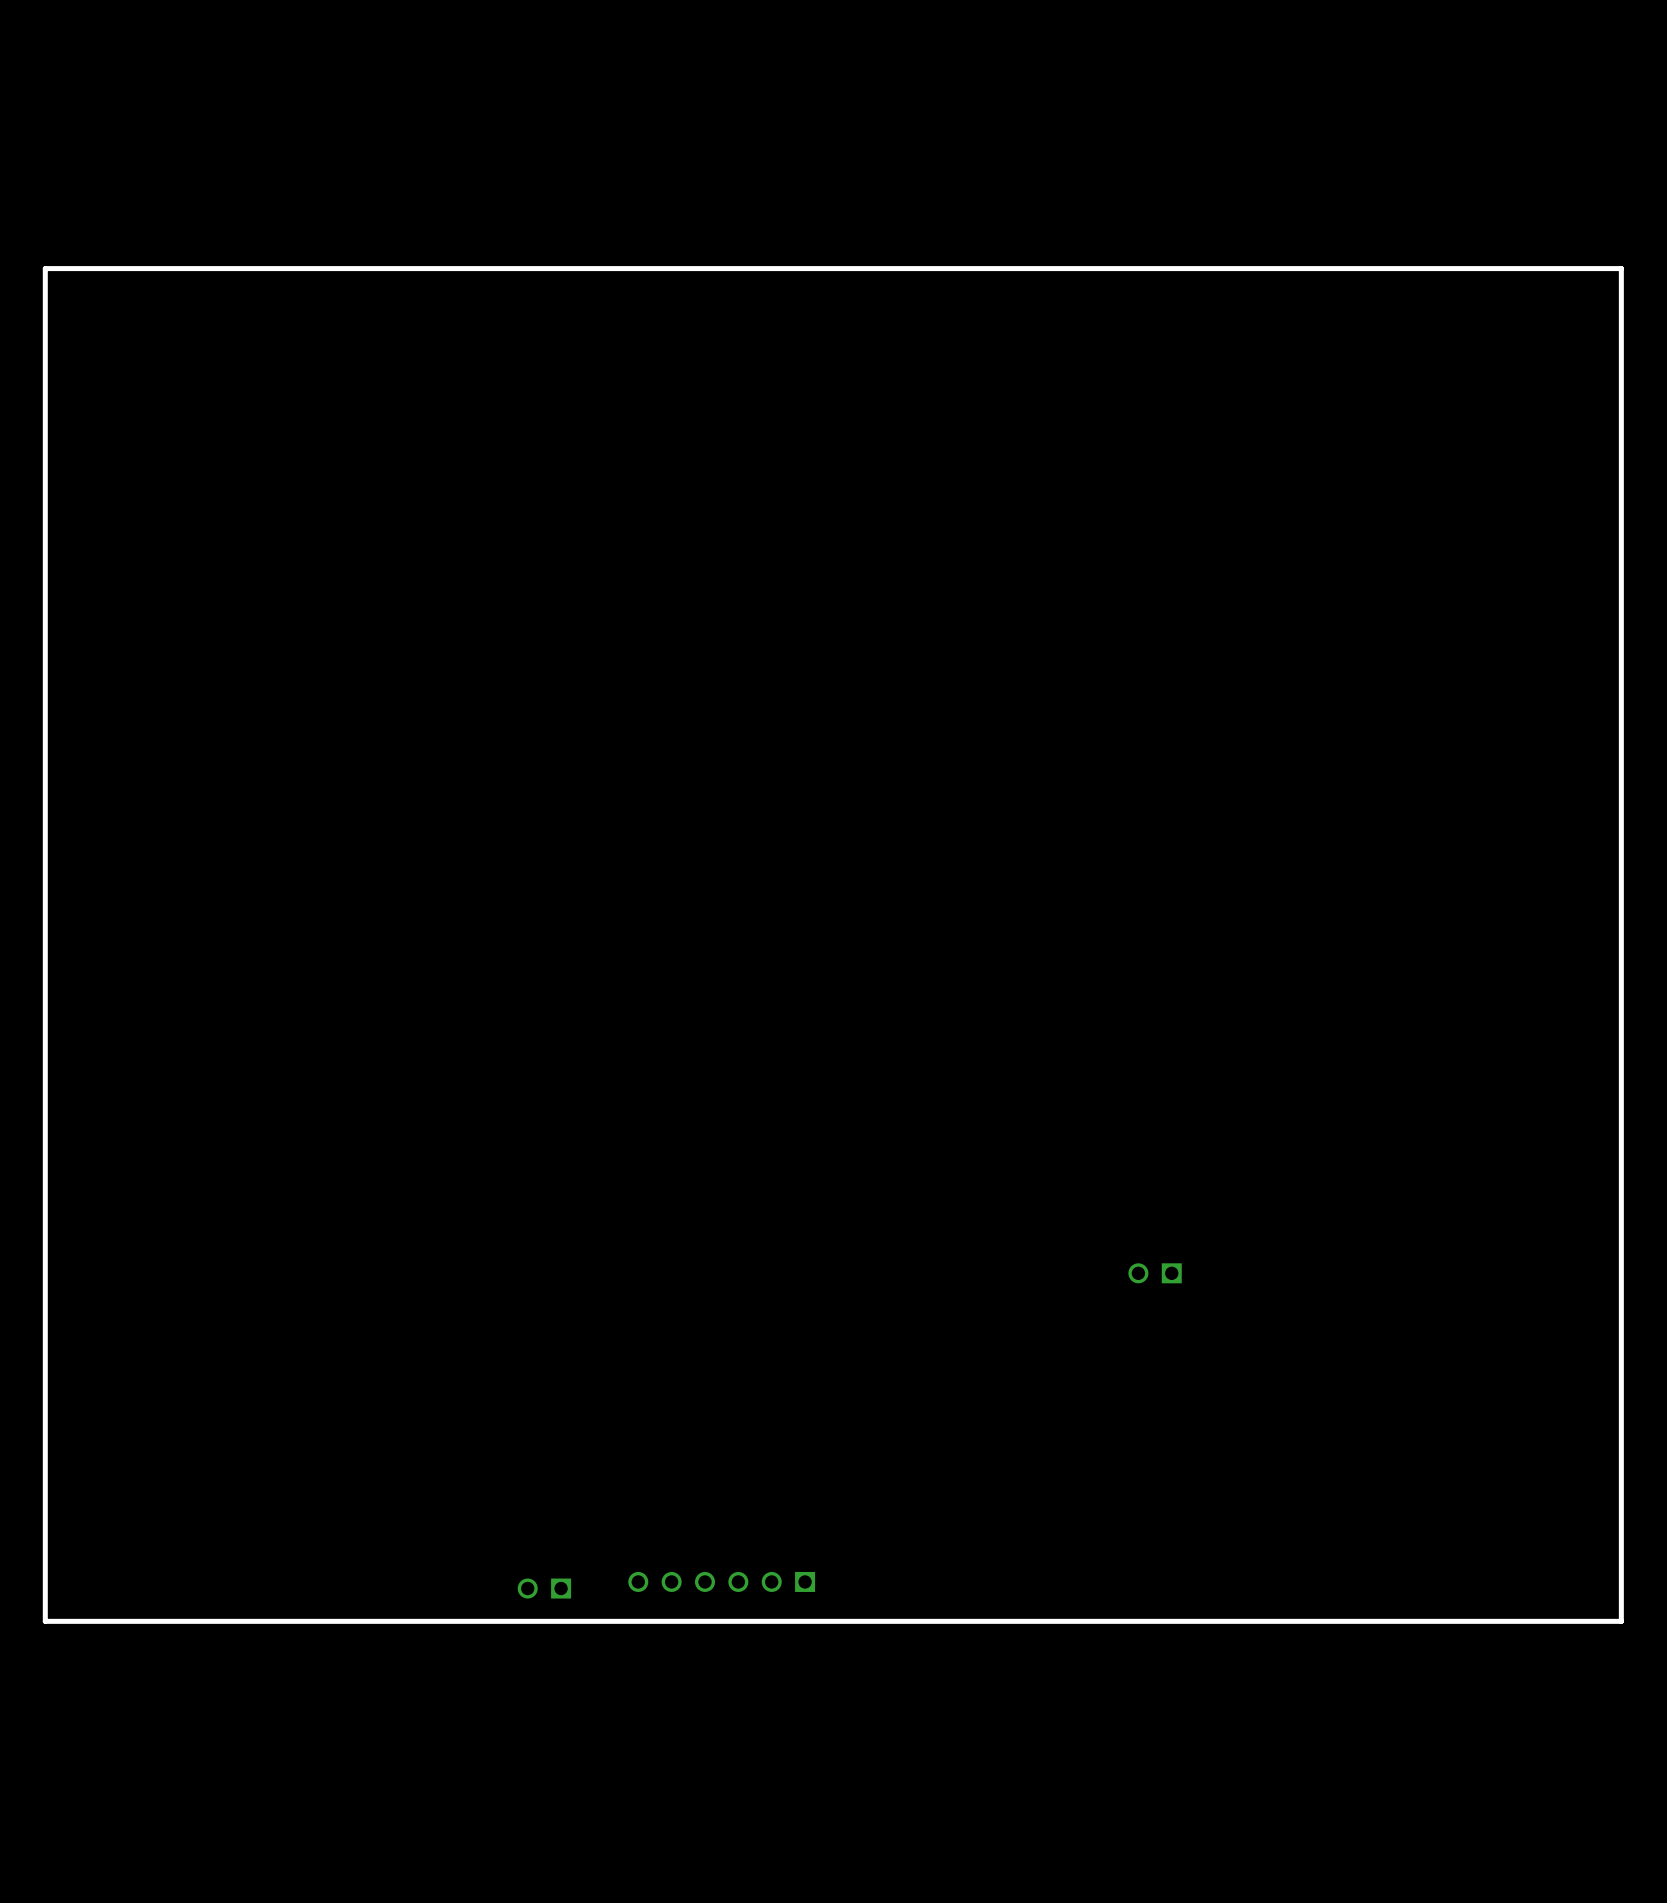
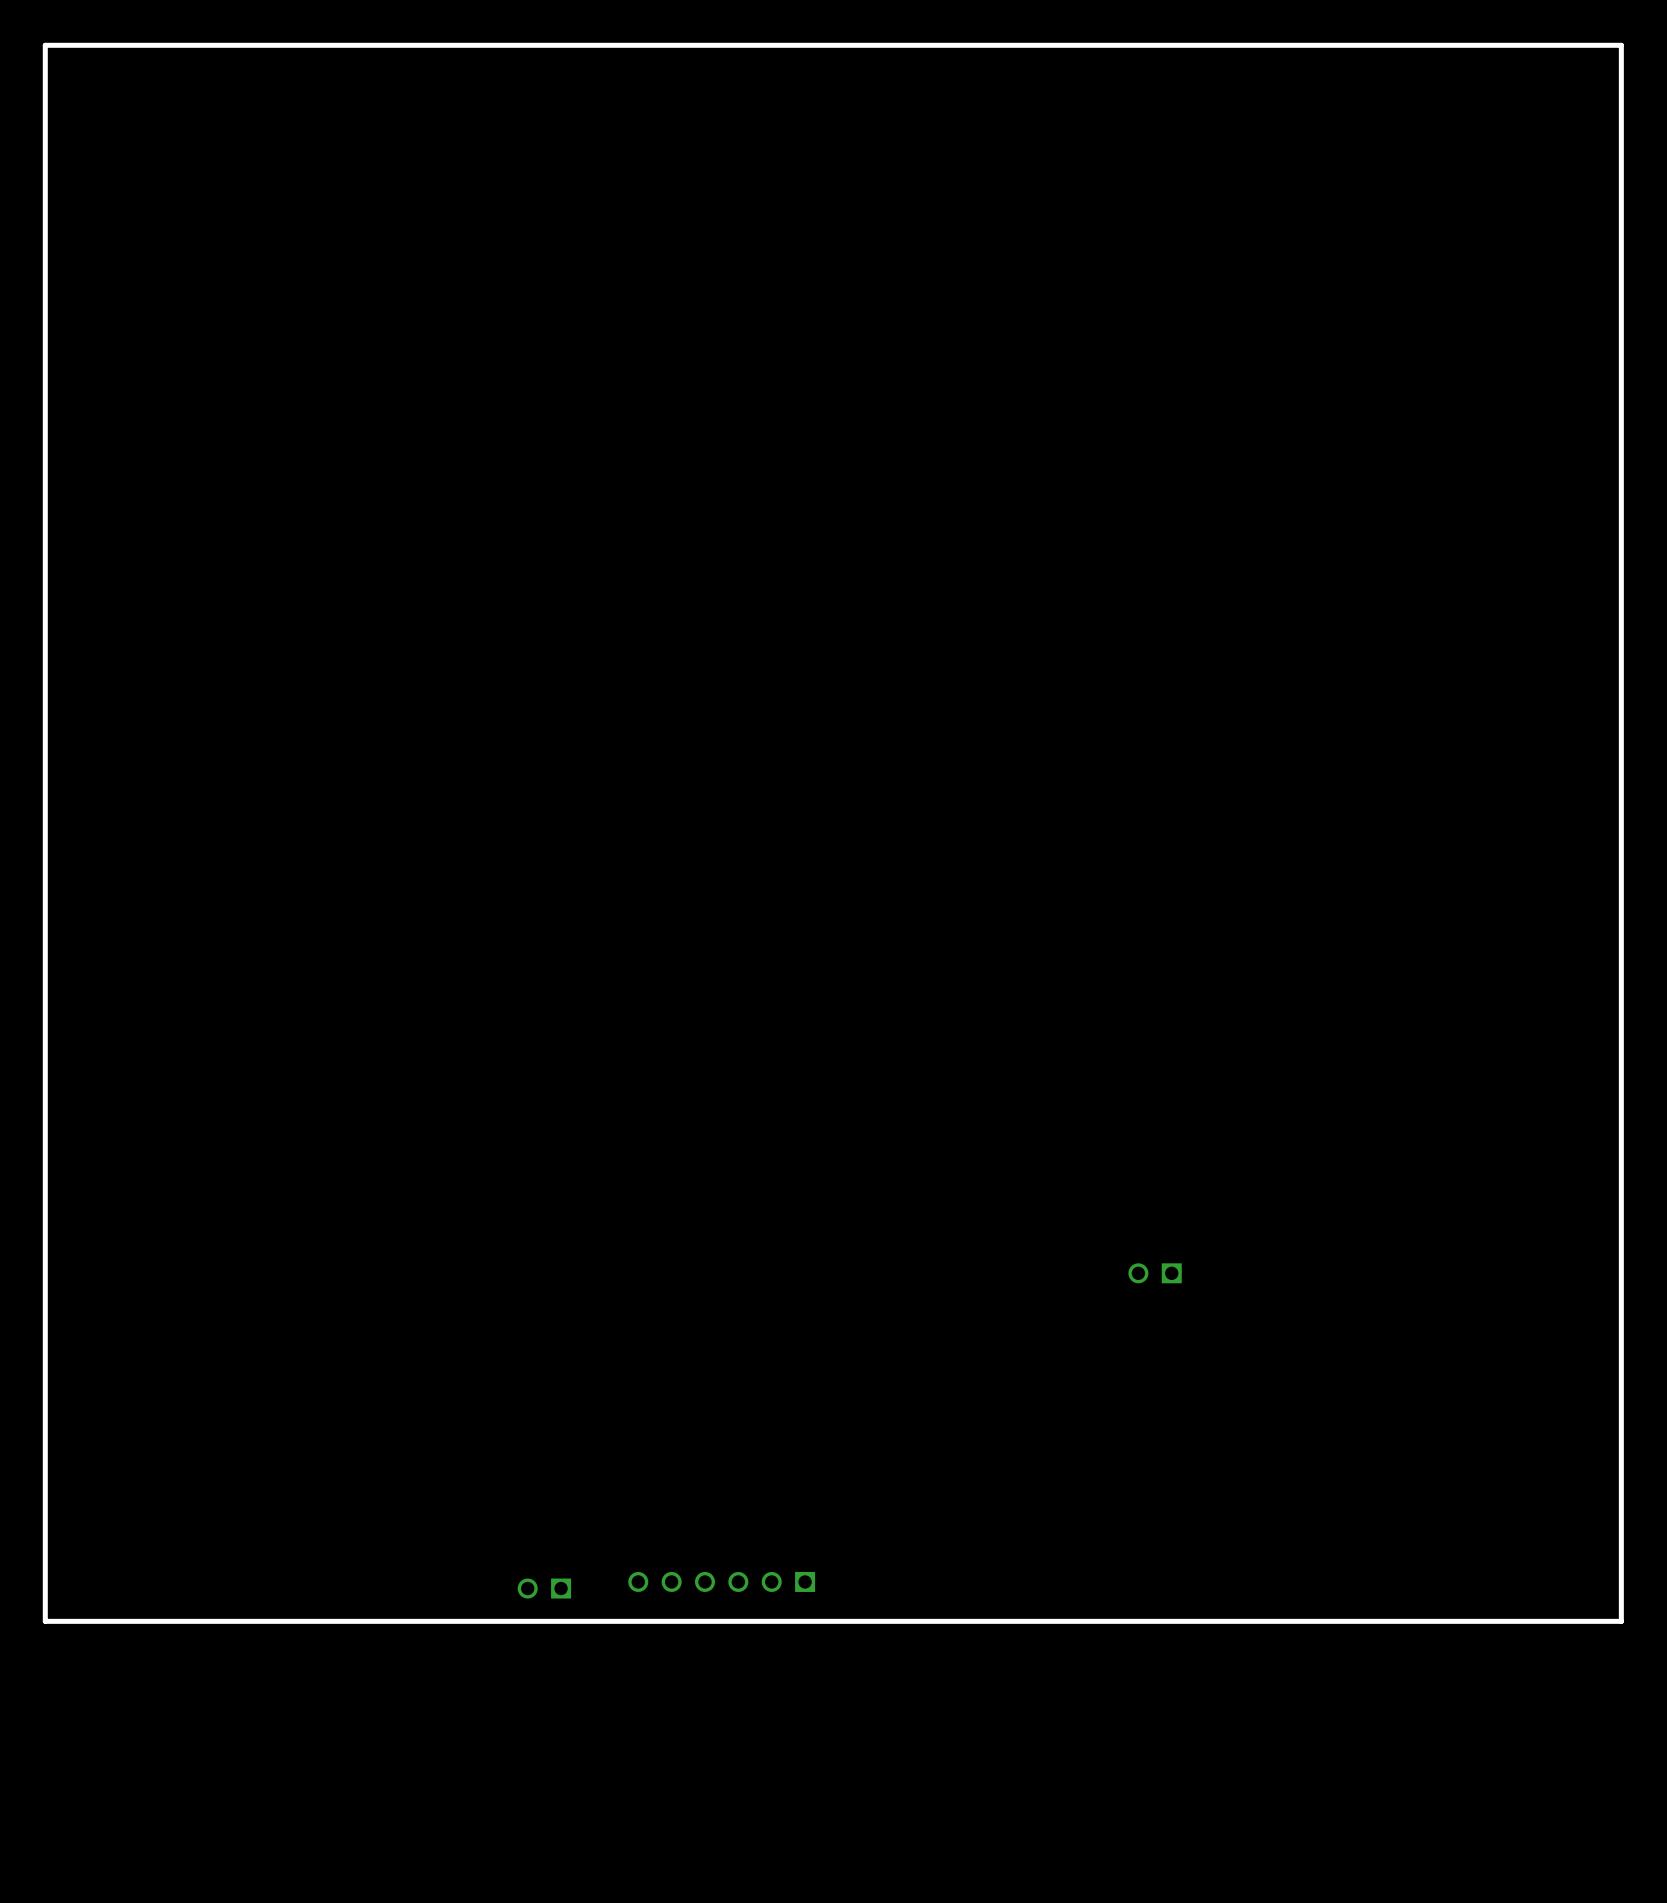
board edge: (1621, 268) (45, 268) -> (1621, 268) (1621, 45) (45, 45) (45, 268)

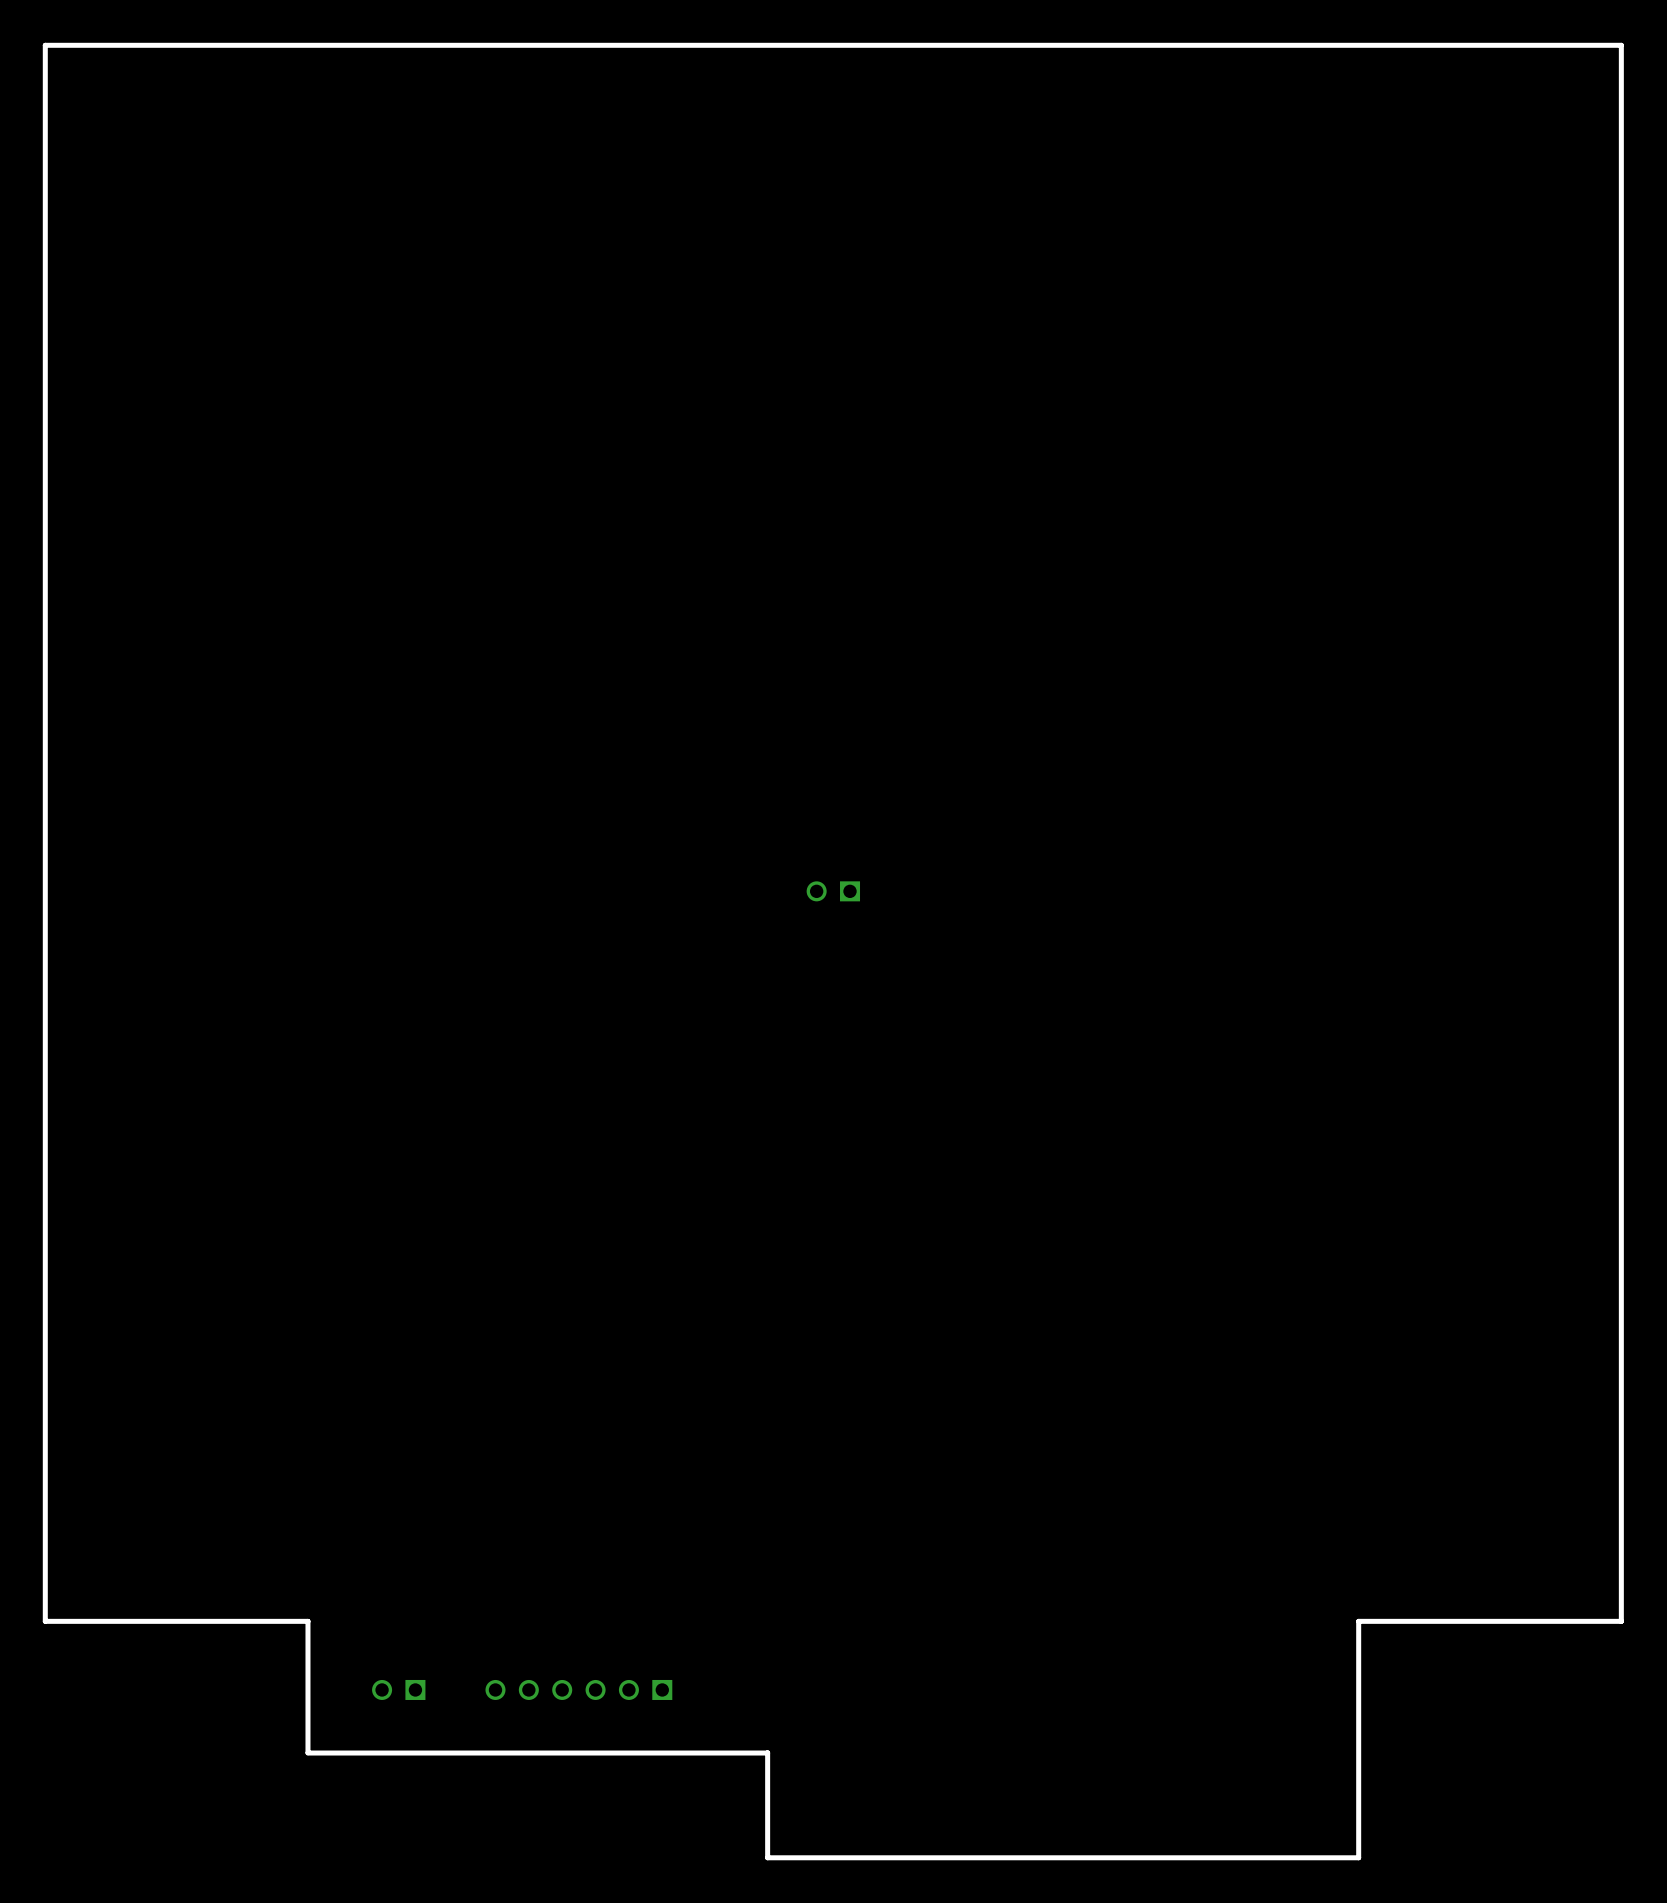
part: none -> (833, 891)
part: (1155, 1273) -> none
part position: (721, 1581) -> (578, 1689)
part position: (544, 1588) -> (398, 1689)
board edge: none -> (307, 1621) (307, 1752)
board edge: (1358, 1621) (307, 1621) -> (1358, 1621) (1358, 1857) (767, 1857) (767, 1752)
board edge: none -> (767, 1753) (307, 1753)

